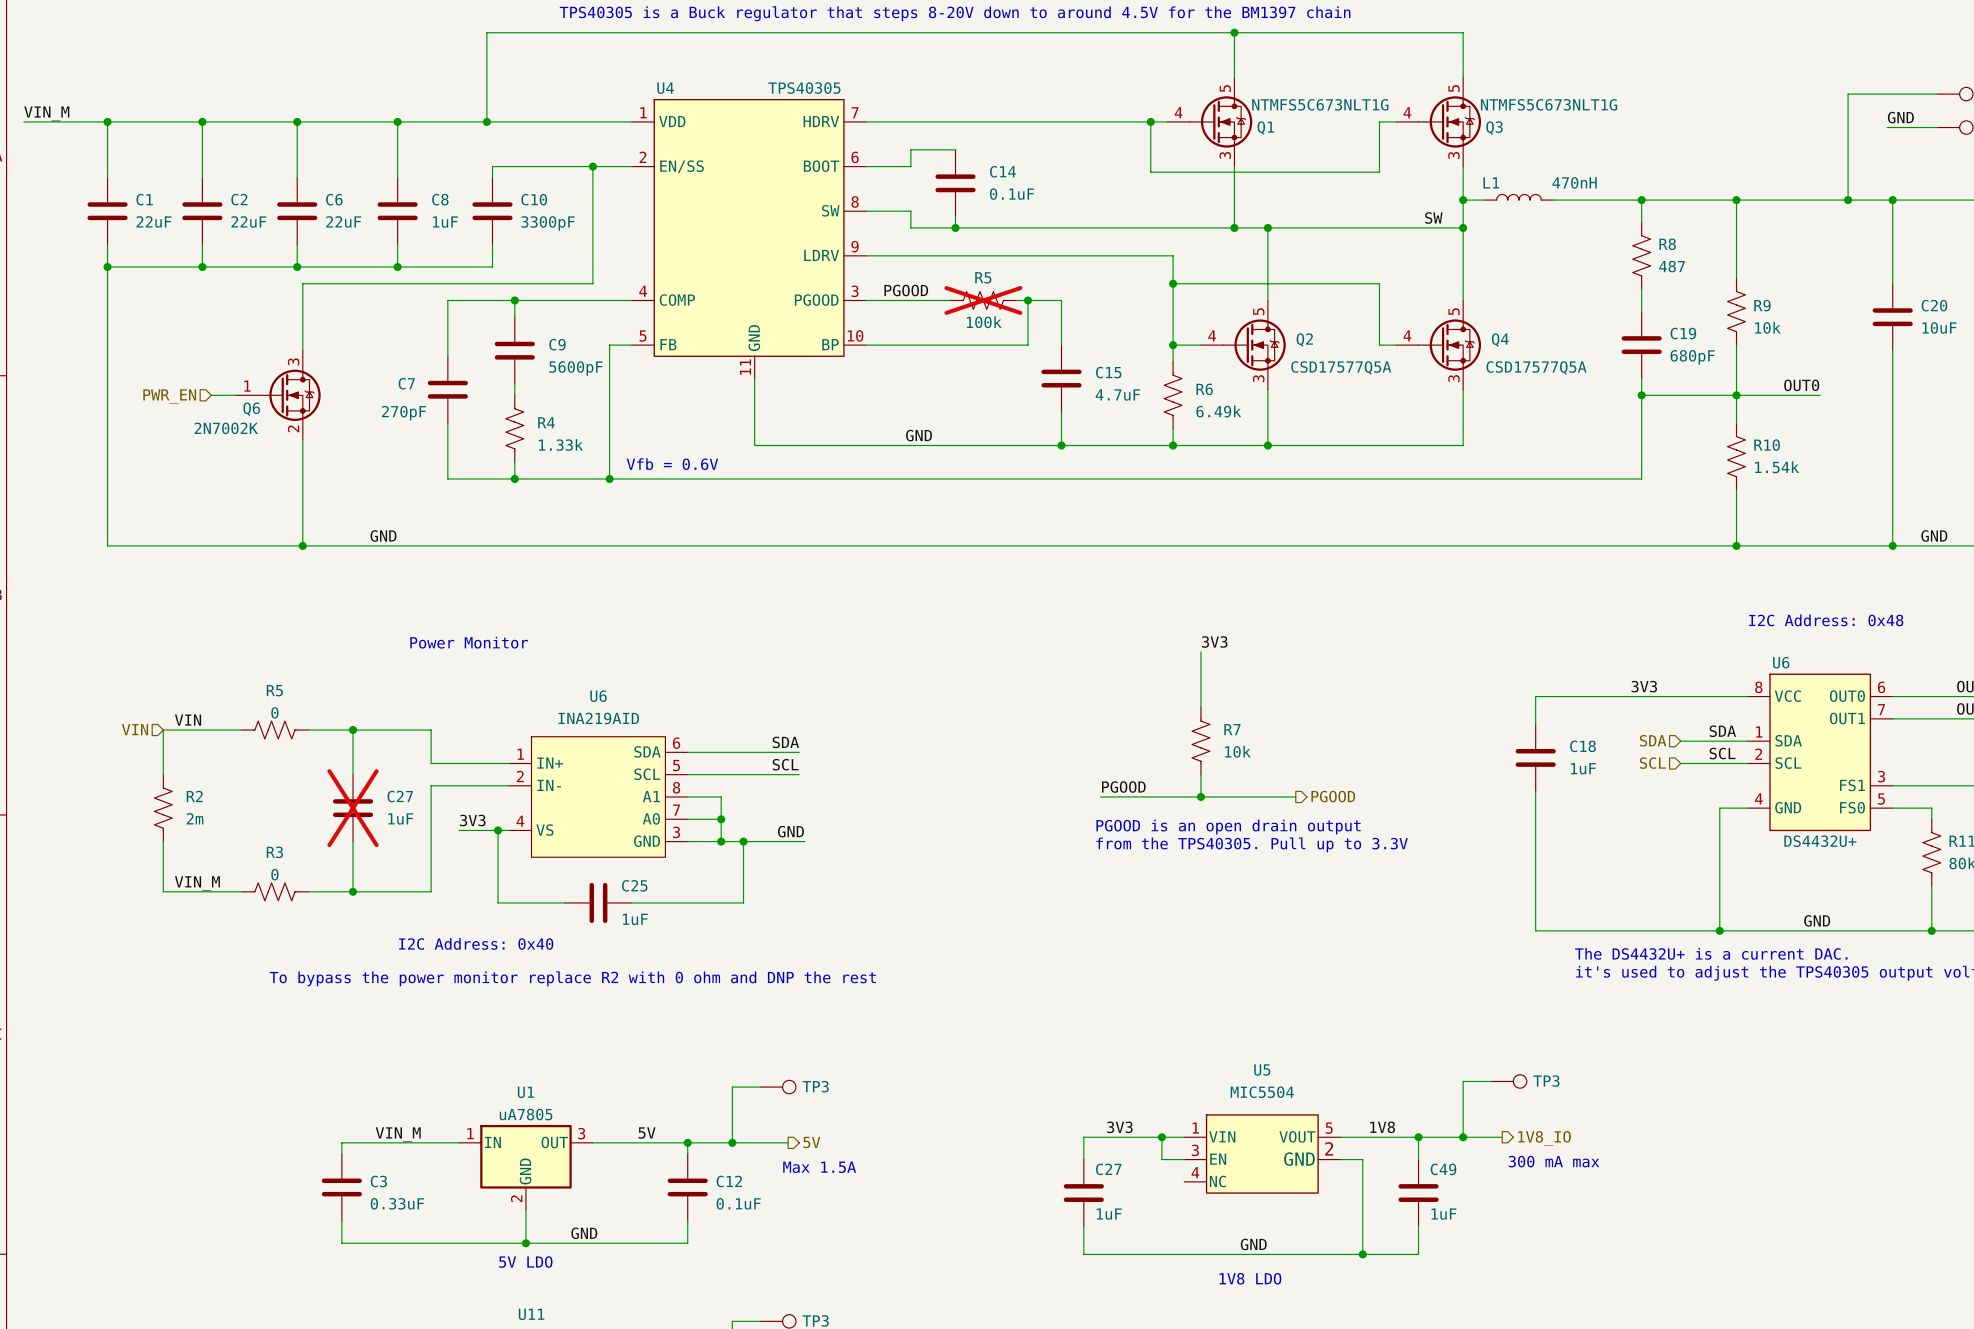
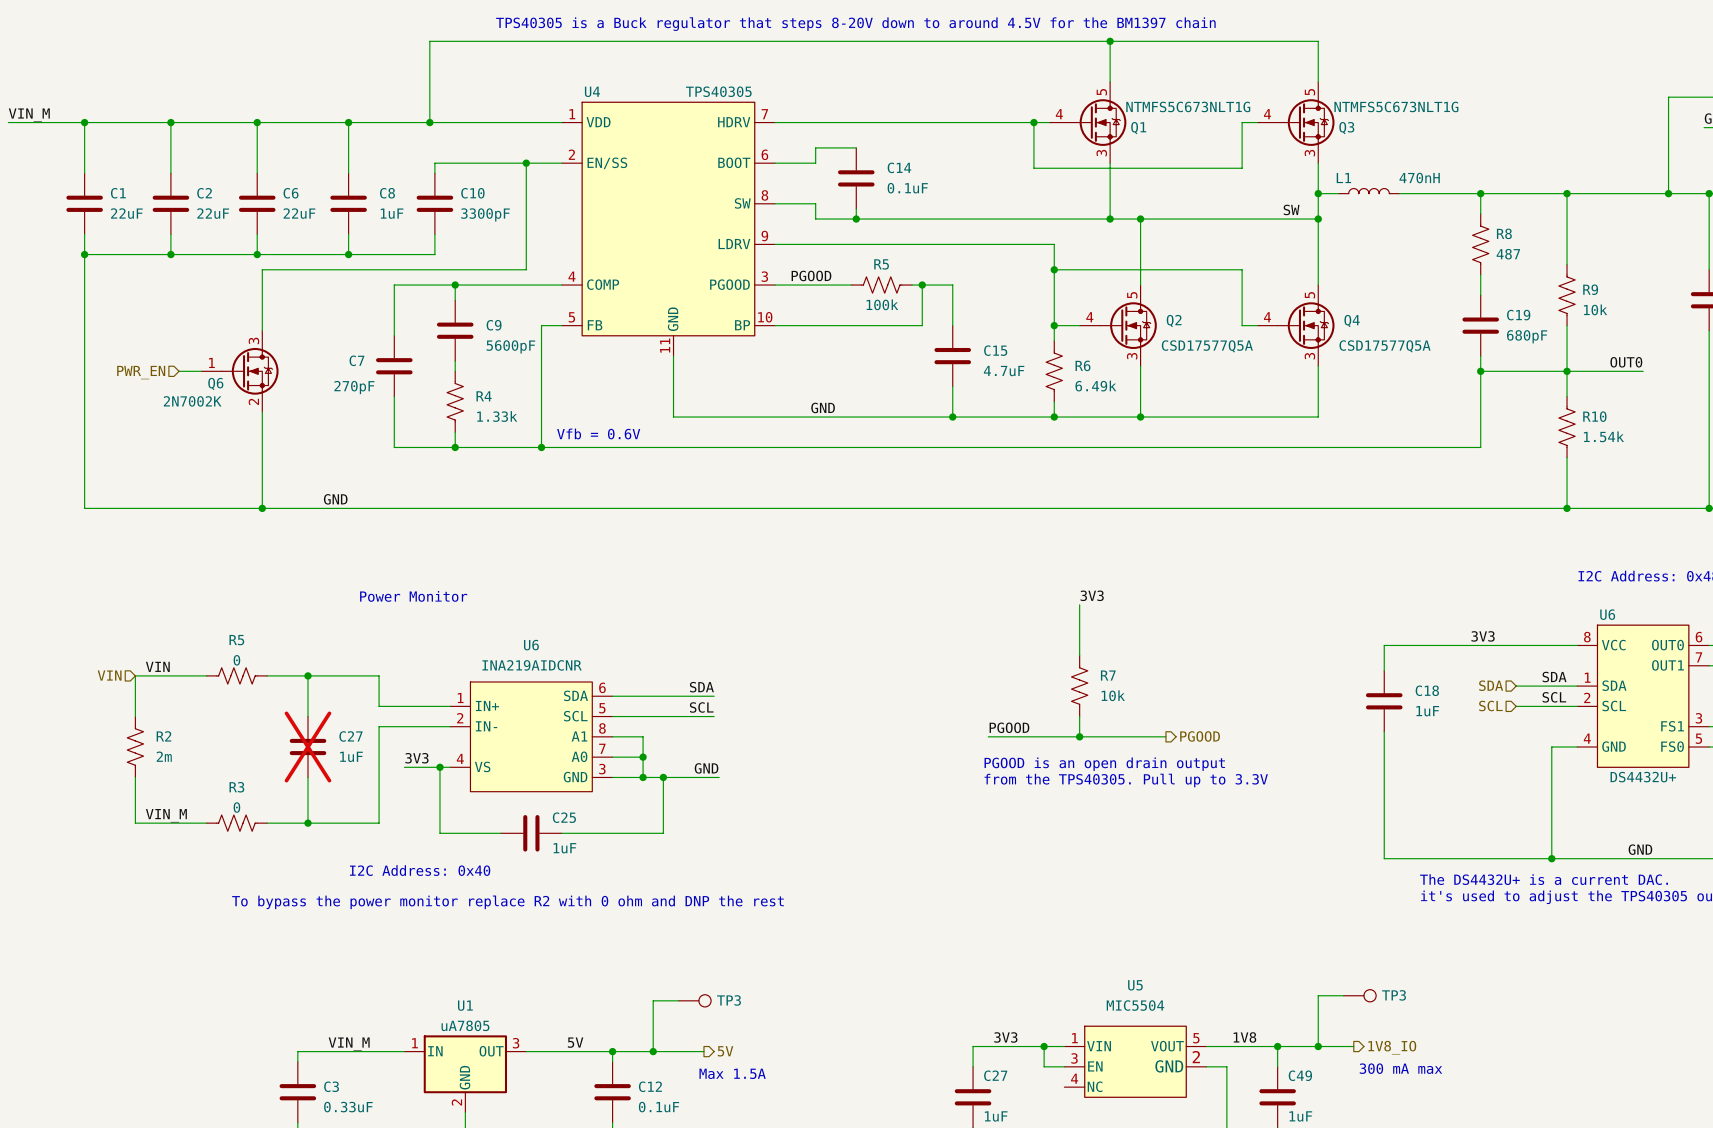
R5 do-not-place cross: (983, 300) -> none
U6 value: INA219AID (598, 718) -> INA219AIDCNR (532, 665)

